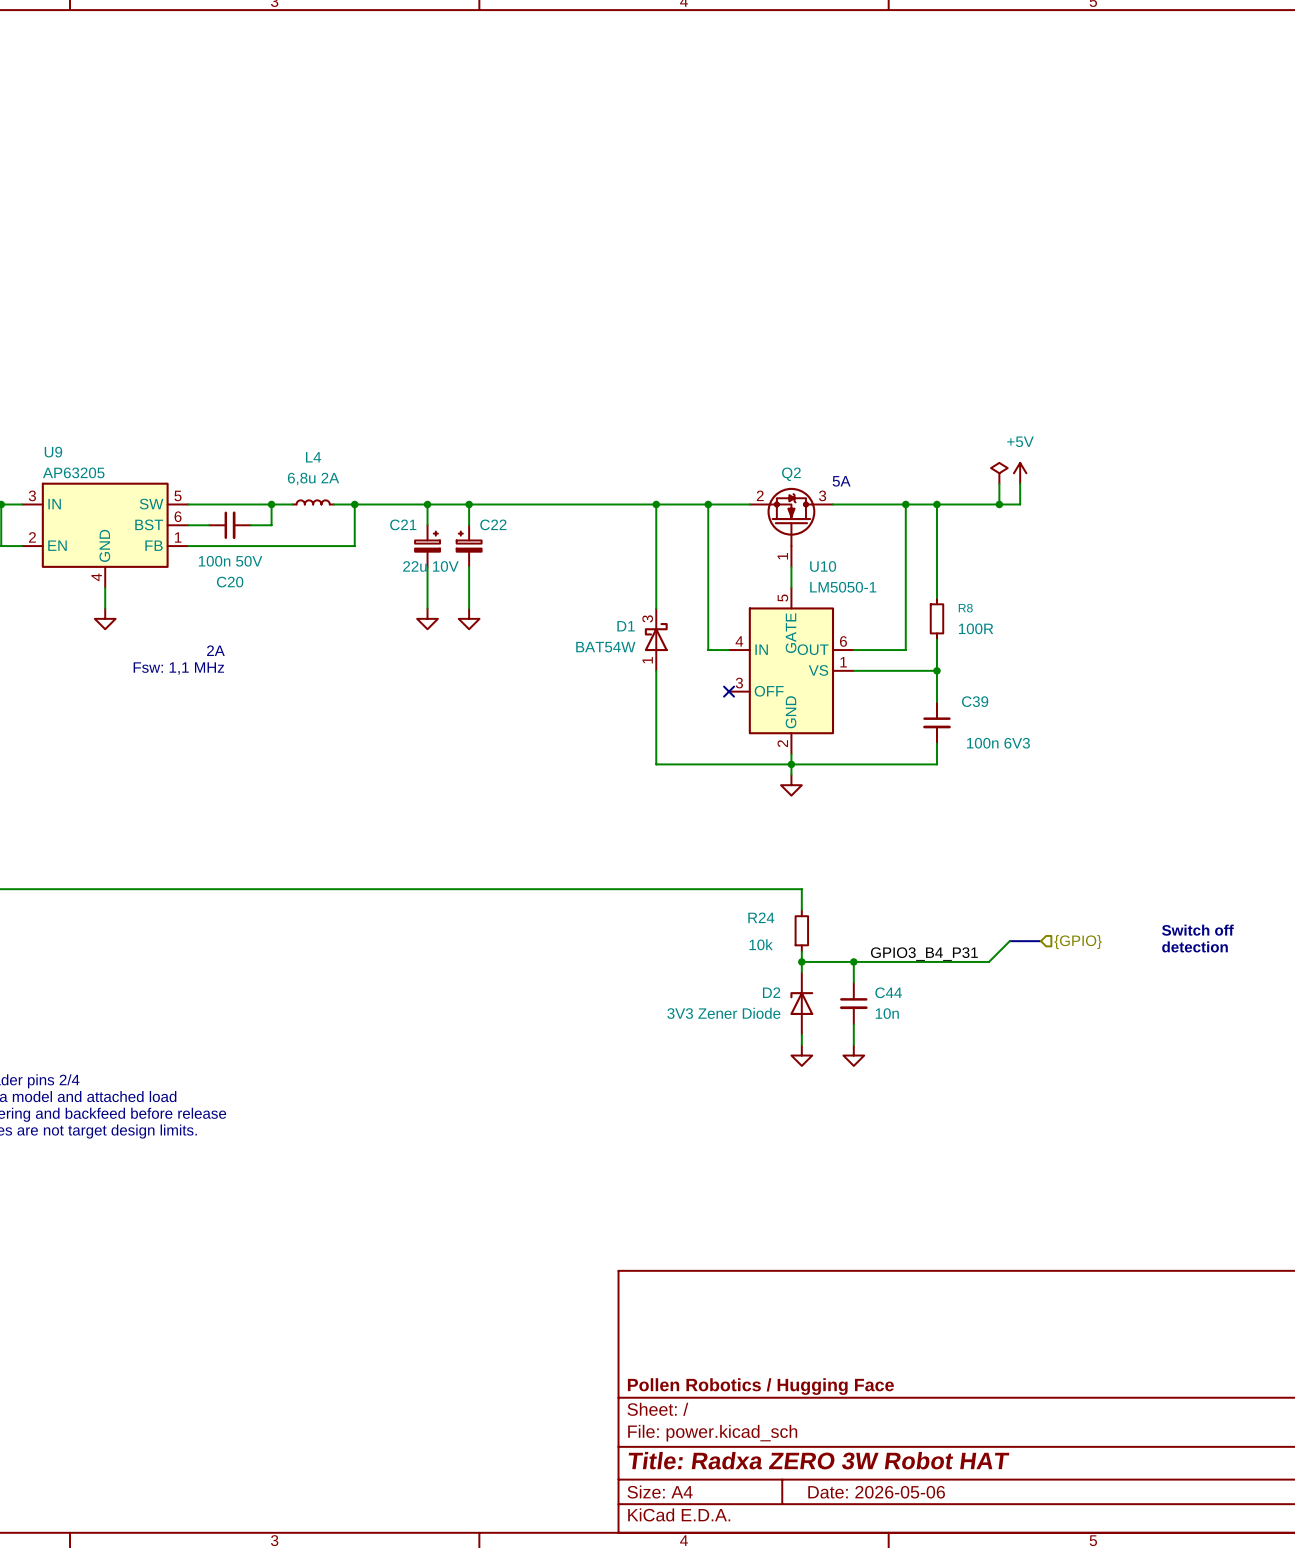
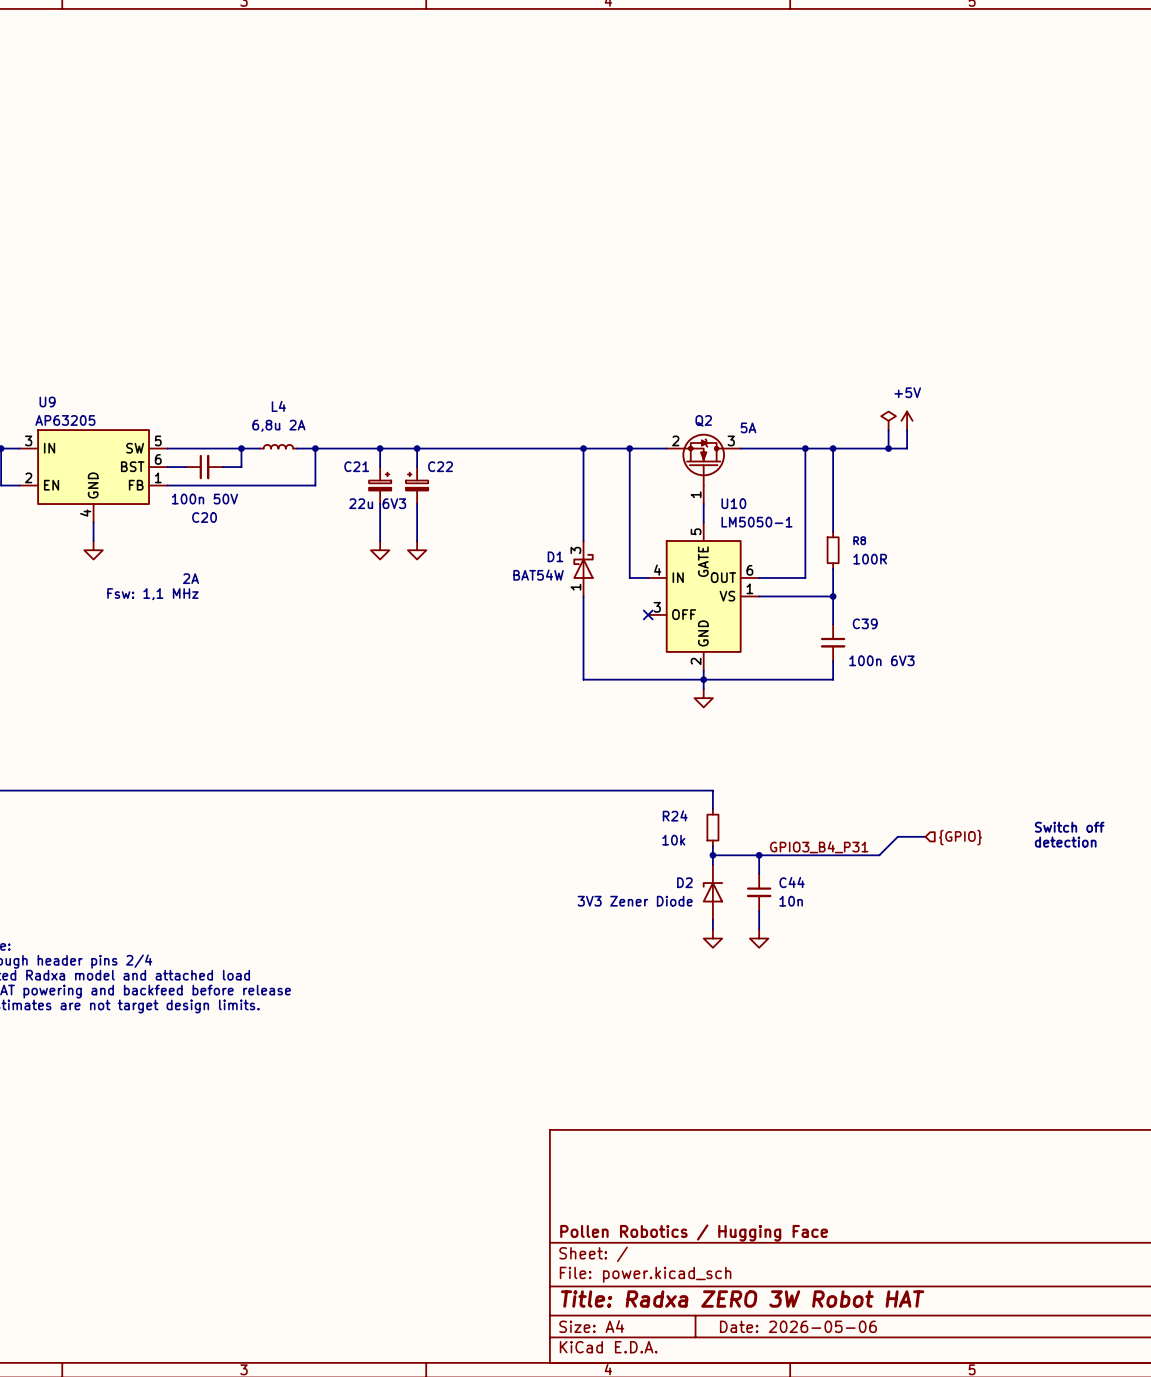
C21 value: 22u 10V (430, 566) -> 22u 6V3 (377, 503)

